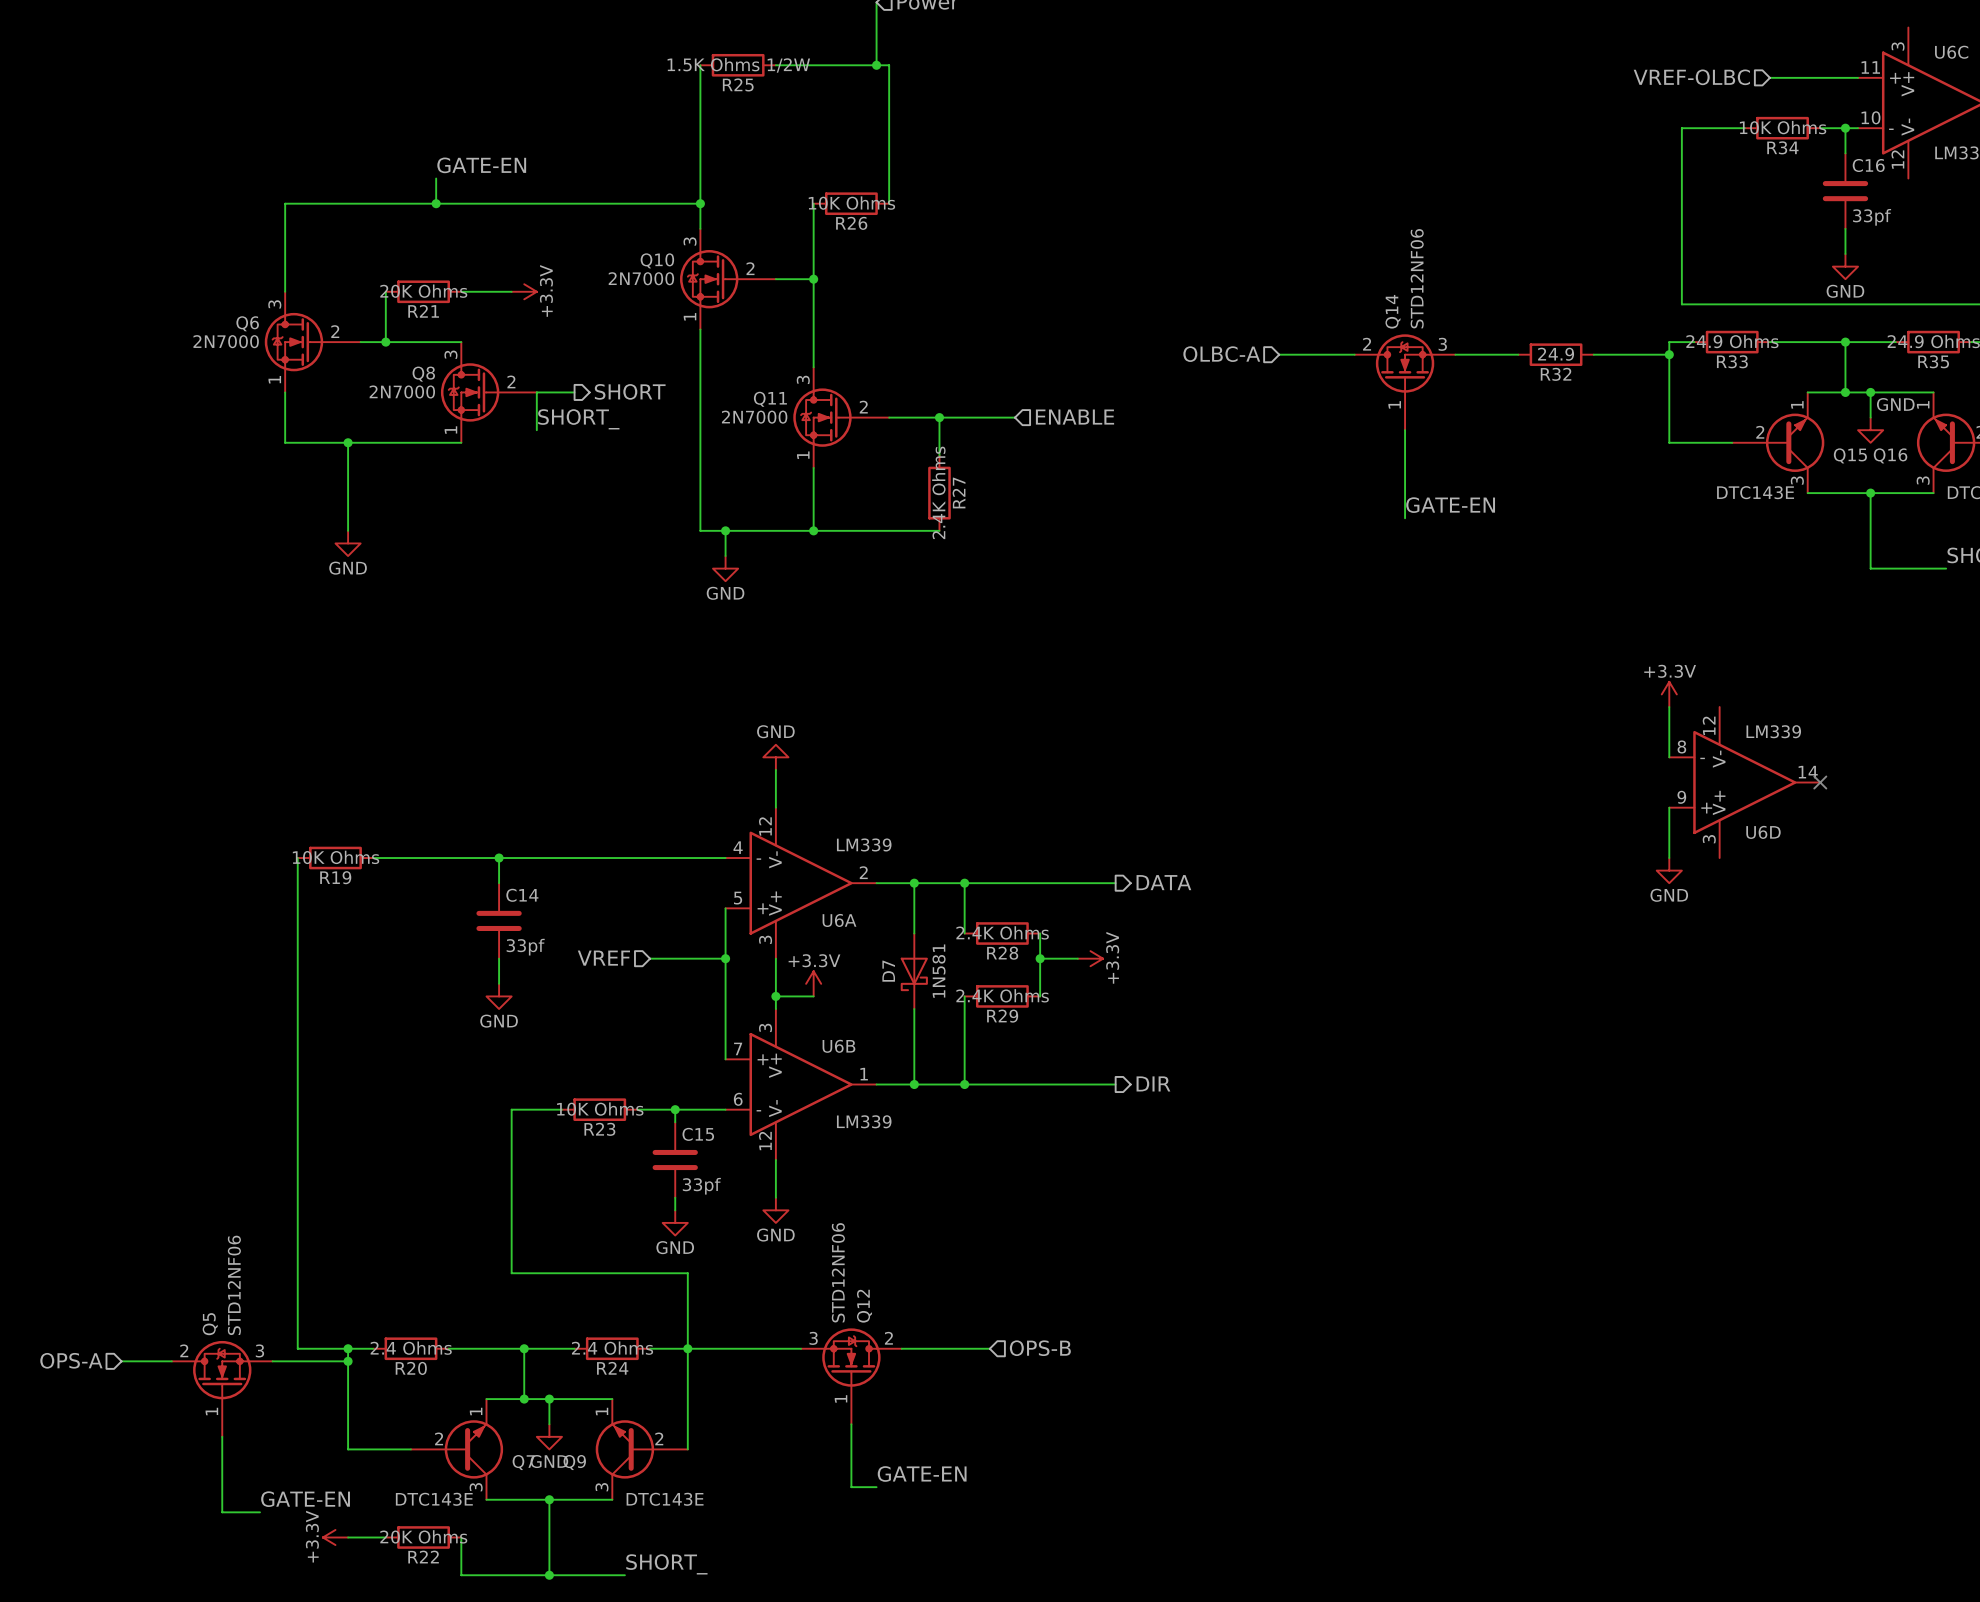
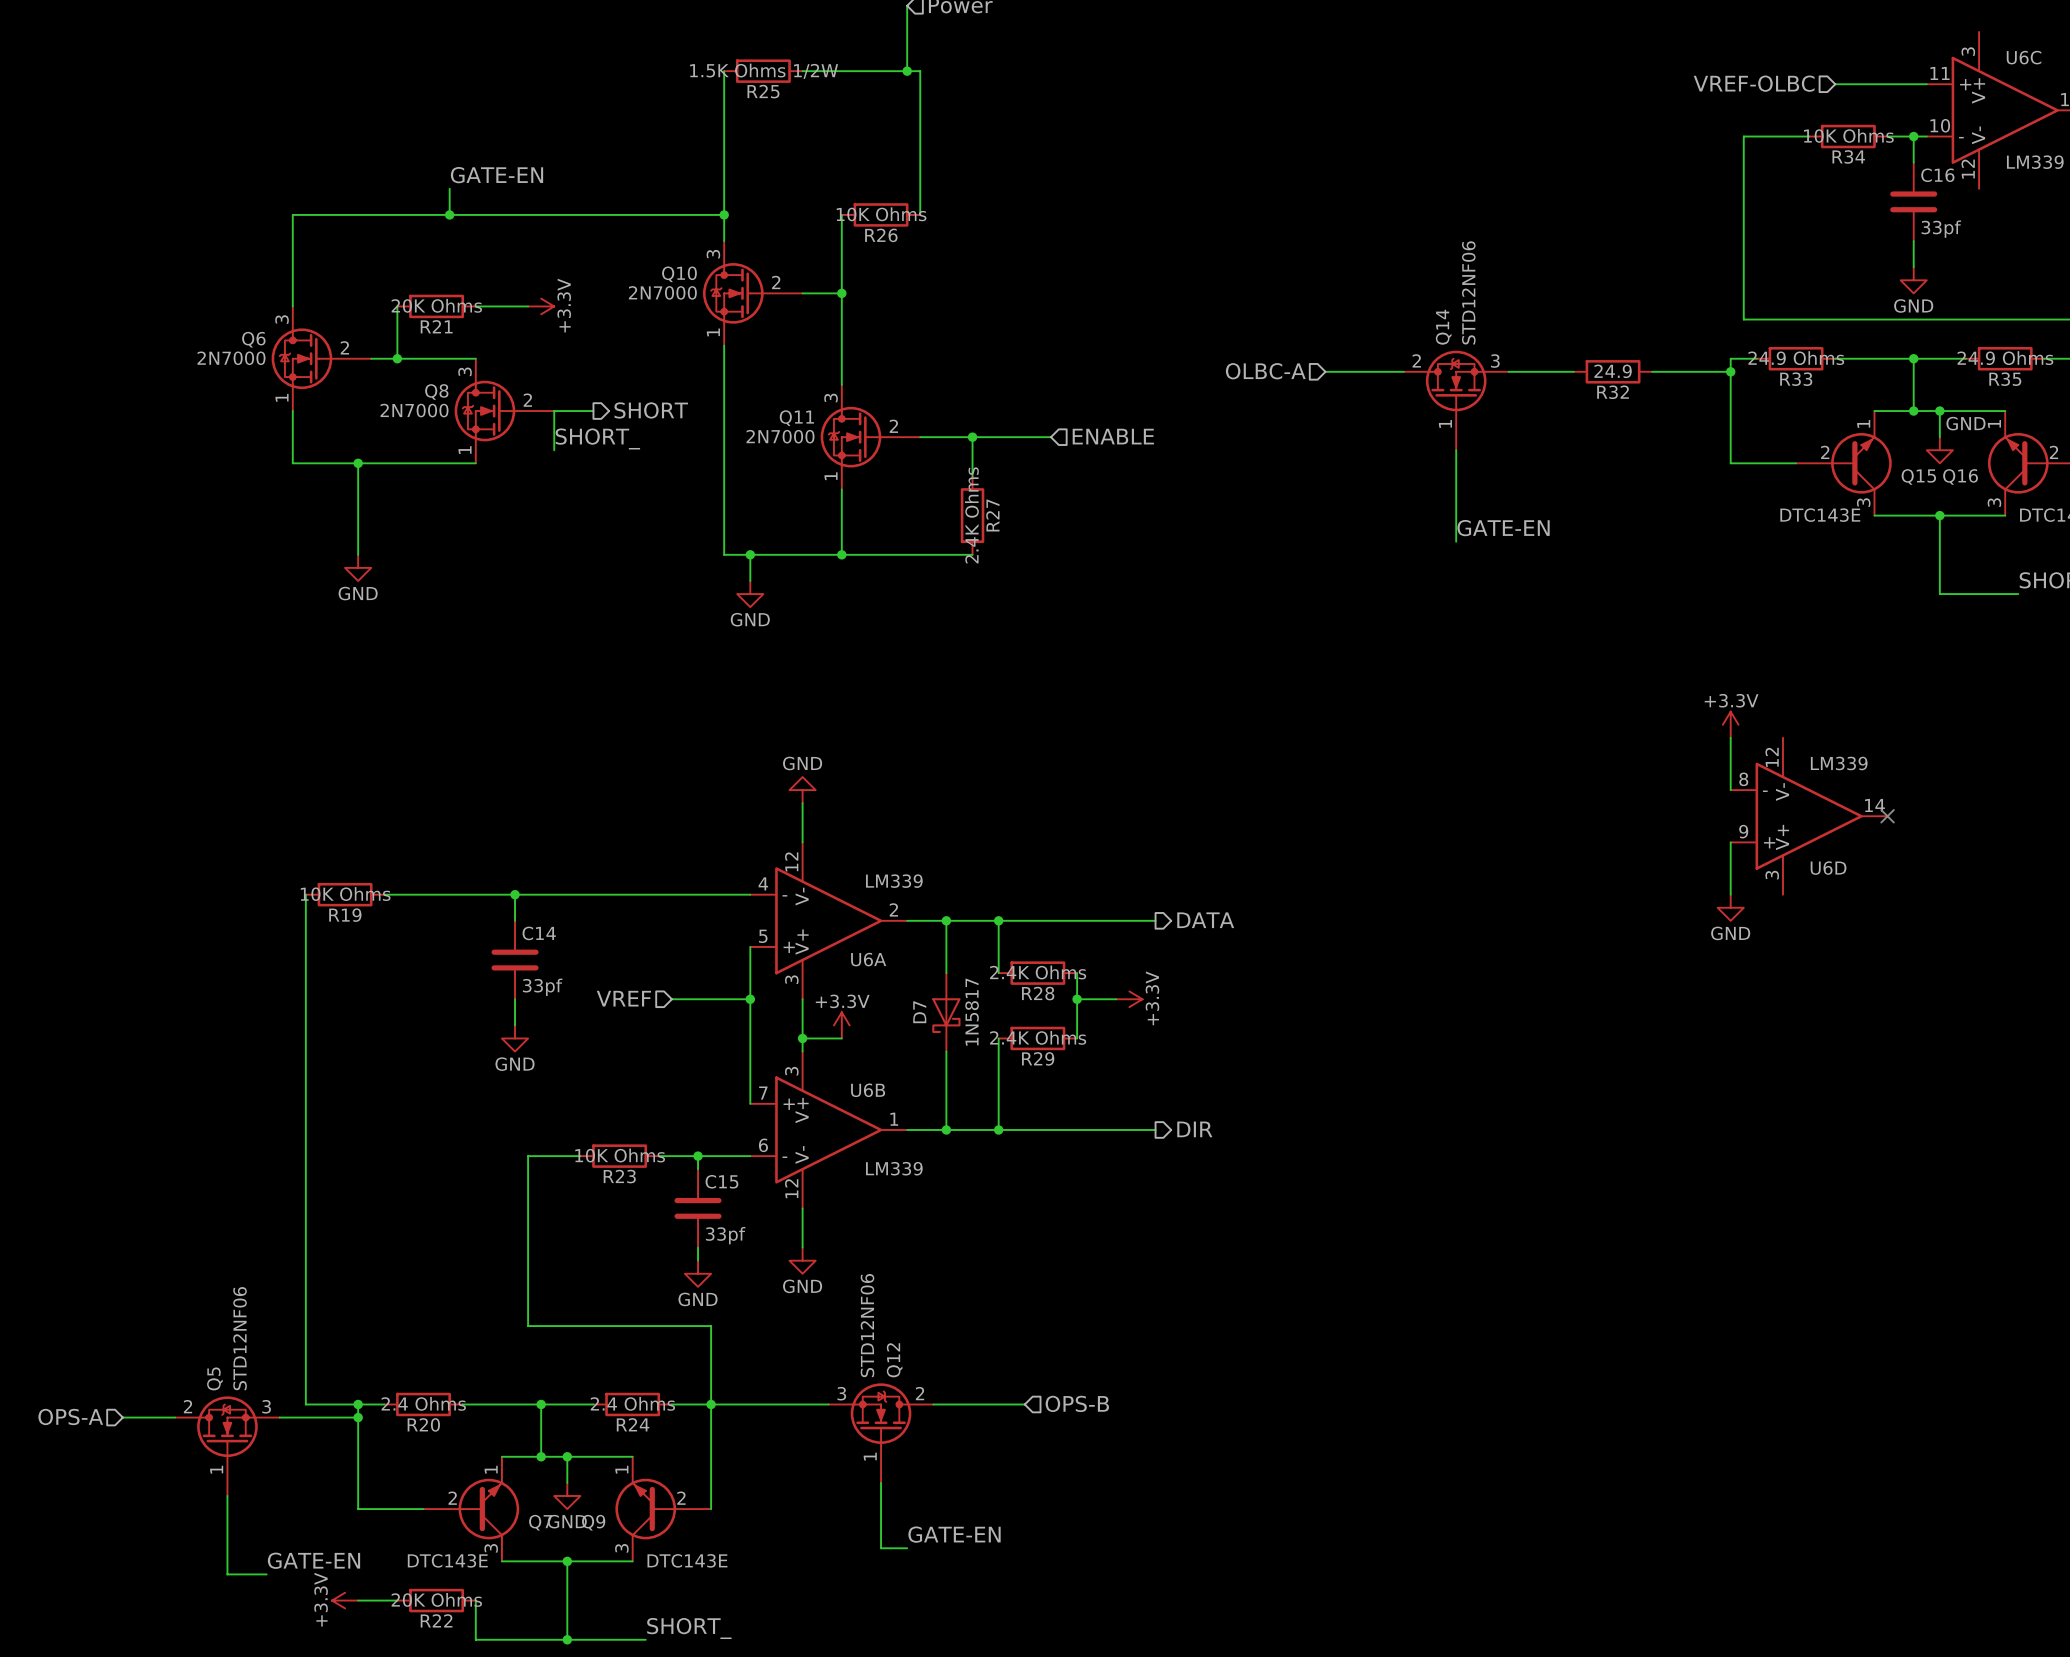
D7 value: 1N581 (939, 971) -> 1N5817 (972, 1012)

